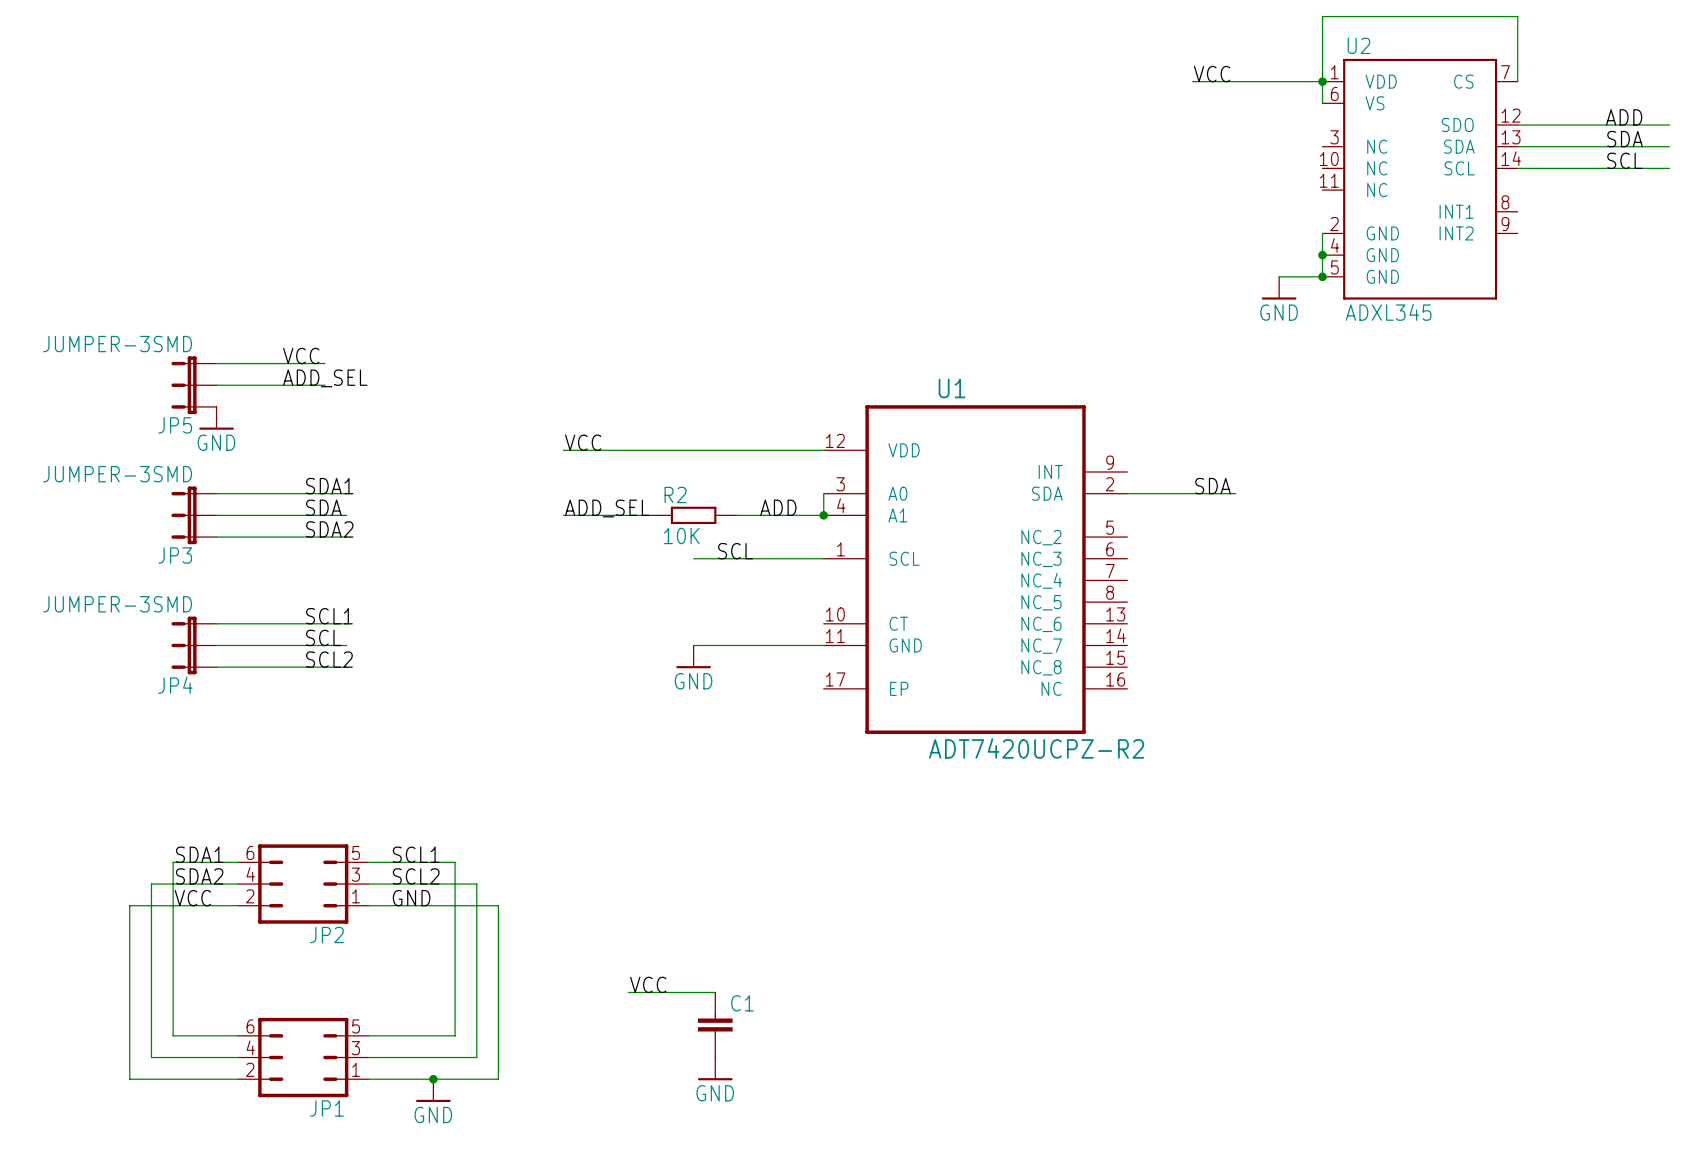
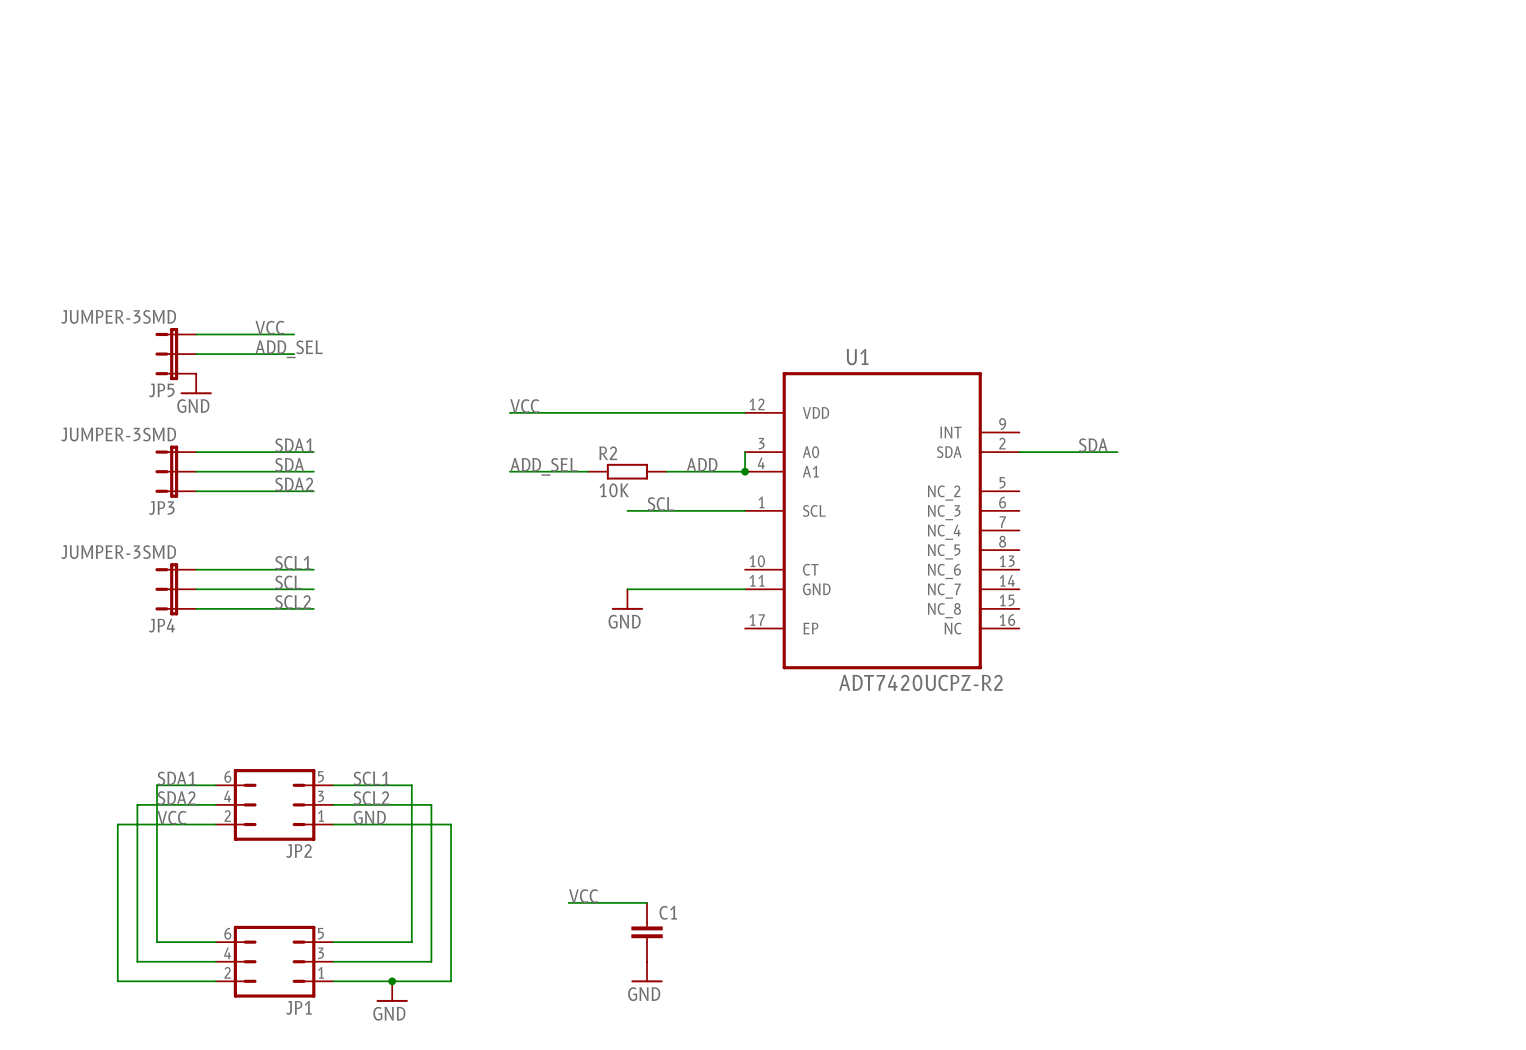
label: VCC (1212, 74) -> none
wire: (1192, 81) (1322, 81) -> none
junction: (1322, 81) -> none
wire: (1517, 81) (1517, 16) (1322, 16) (1322, 103) -> none
label: ADD (1624, 117) -> none
wire: (1517, 125) (1669, 125) -> none
label: SDA (1625, 139) -> none
wire: (1517, 146) (1669, 146) -> none
label: SCL (1624, 160) -> none
wire: (1517, 168) (1669, 168) -> none
U2: ADXL345 (1420, 179) -> none
wire: (1322, 233) (1322, 276) (1279, 276) -> none
junction: (1322, 255) -> none
junction: (1322, 276) -> none
power symbol: GND (1279, 288) -> none

